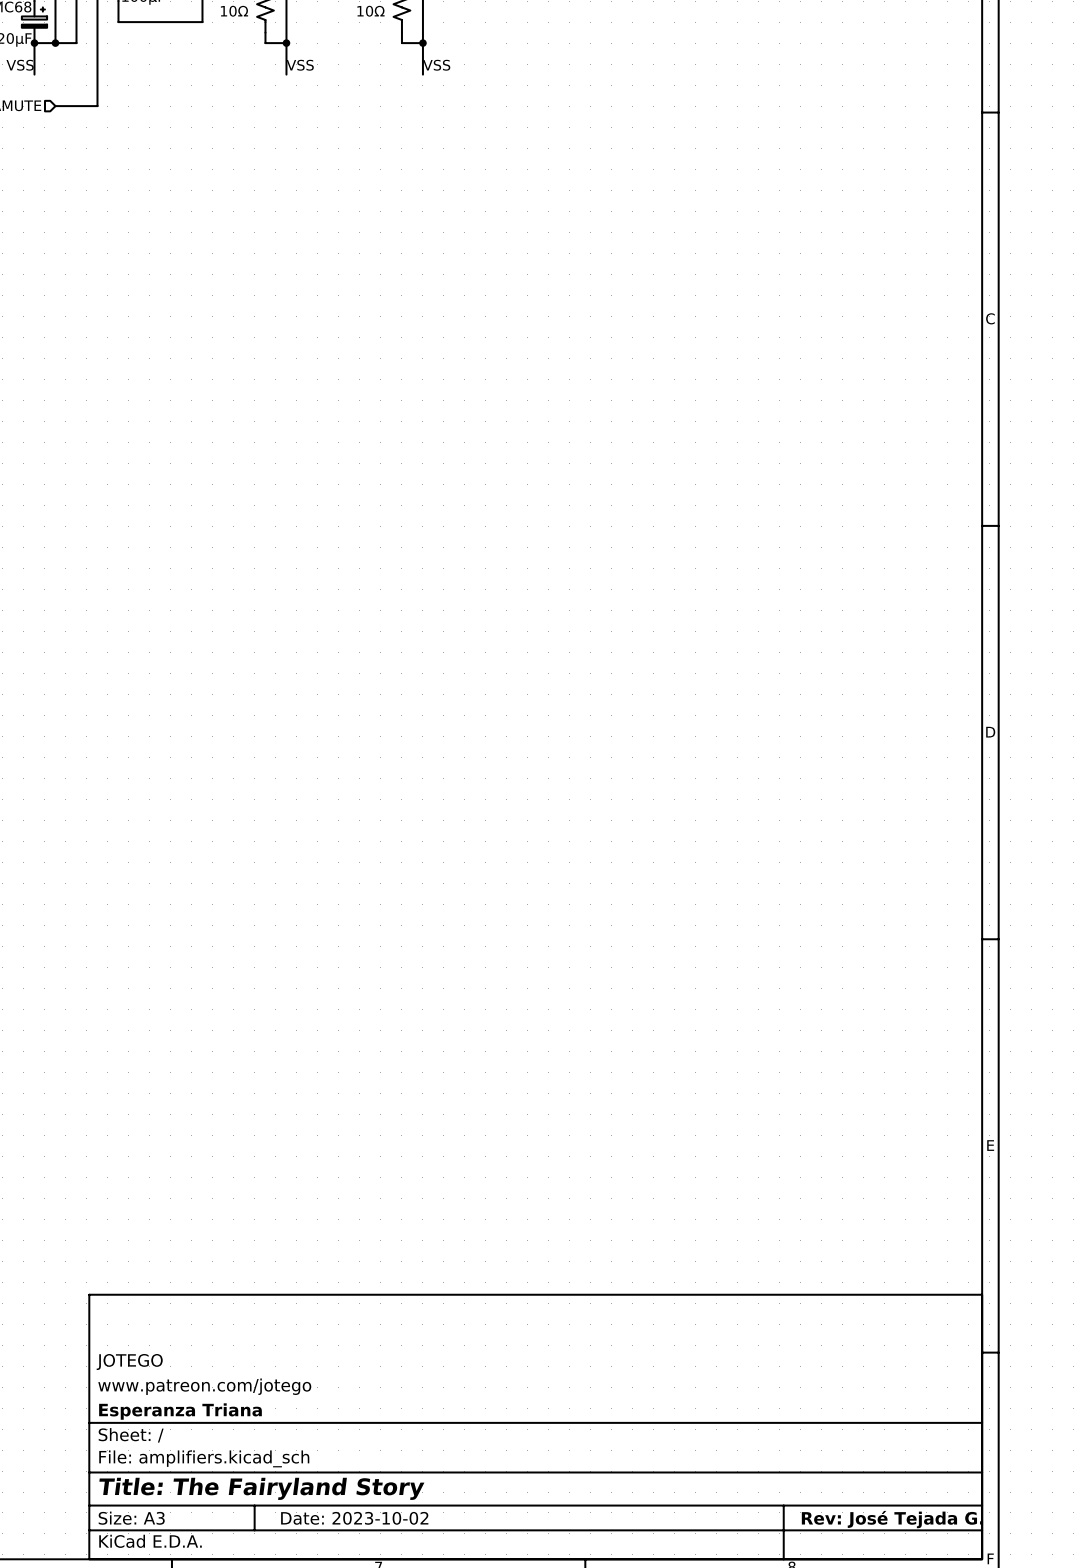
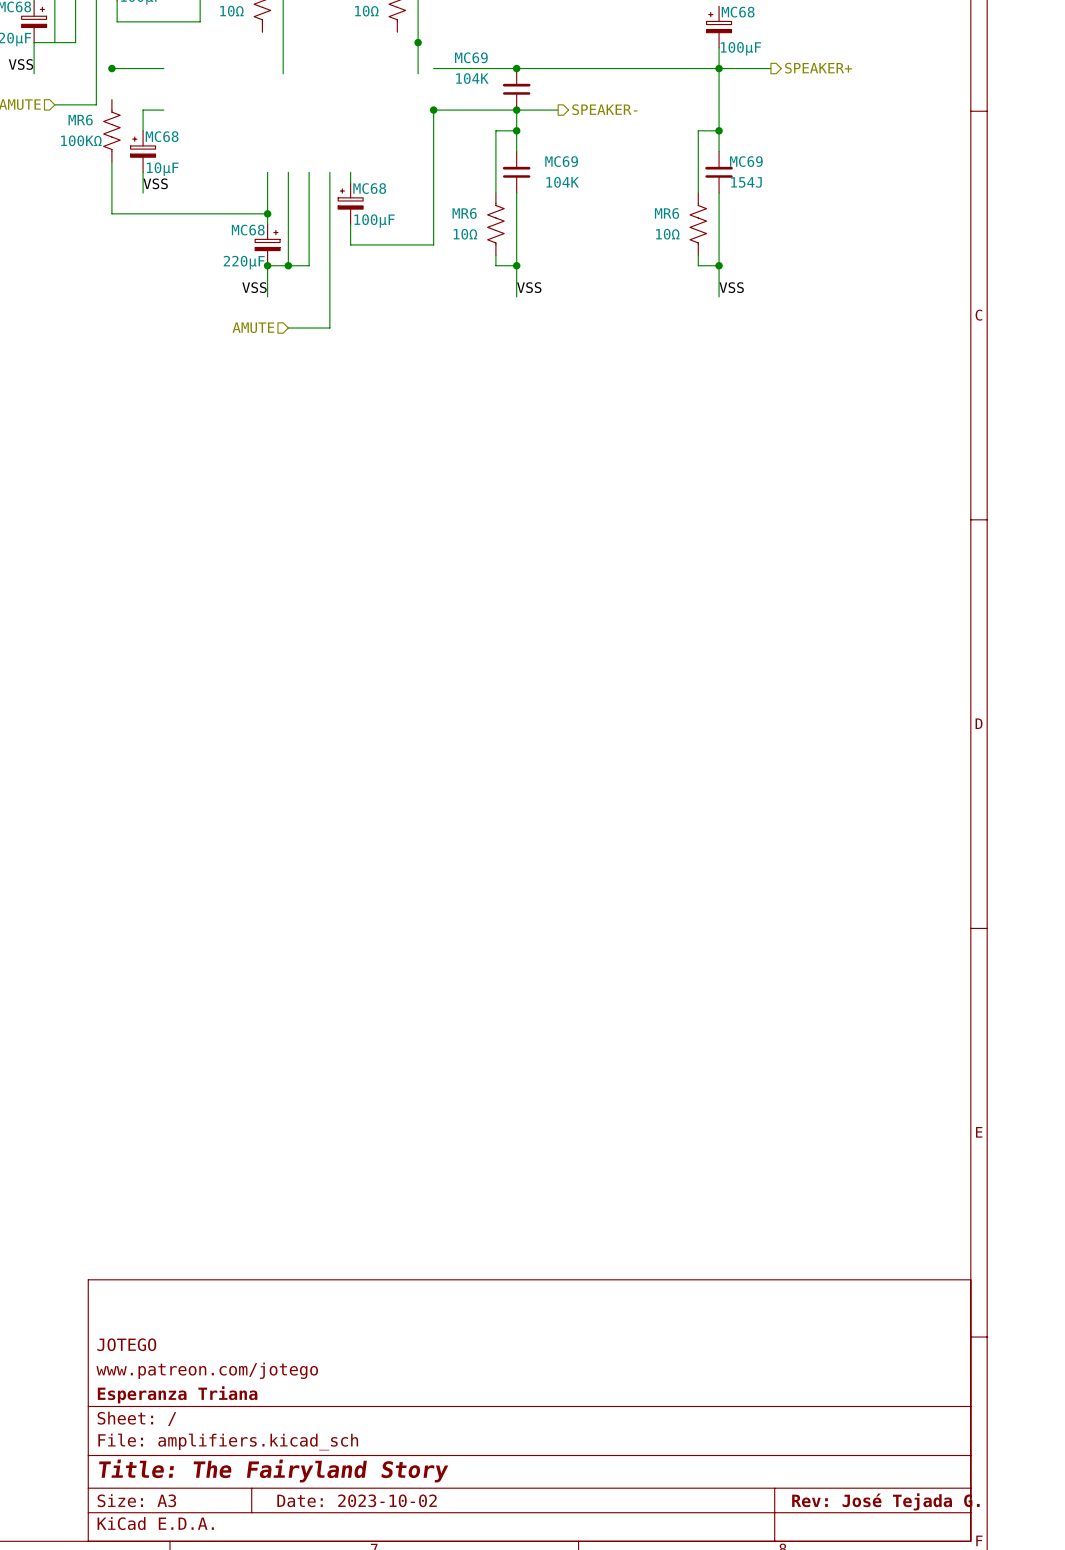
MC68: none -> 100µF (719, 27)
wire: (265, 32) (265, 43) (286, 43) -> none
wire: (401, 32) (401, 43) (422, 43) -> none
junction: (34, 43) -> none
junction: (55, 43) -> none
junction: (286, 43) -> none
wire: none -> (719, 47) (719, 151)
label: VSS (300, 65) -> none
label: VSS (436, 65) -> none
hierarchical label: none -> SPEAKER+ (818, 68)
wire: none -> (111, 68) (163, 68)
junction: none -> (111, 68)
wire: none -> (433, 68) (770, 68)
junction: none -> (516, 68)
junction: none -> (719, 68)
MC69: none -> 104K (516, 89)
hierarchical label: none -> SPEAKER- (604, 109)
wire: none -> (163, 110) (143, 110) (143, 130)
junction: none -> (433, 110)
wire: none -> (516, 110) (516, 151)
junction: none -> (516, 110)
wire: none -> (558, 110) (433, 110) (433, 244) (350, 244) (350, 224)
MR6: none -> 100KΩ (111, 130)
wire: none -> (516, 130) (495, 130) (495, 193)
junction: none -> (516, 130)
wire: none -> (719, 130) (698, 130) (698, 193)
junction: none -> (719, 130)
MC68: none -> 10µF (143, 151)
wire: none -> (111, 161) (111, 213) (267, 213)
wire: none -> (143, 172) (143, 193)
wire: none -> (267, 172) (267, 224)
wire: none -> (288, 172) (288, 265)
wire: none -> (309, 172) (309, 265) (267, 265) (267, 296)
wire: none -> (329, 172) (329, 328) (288, 328)
wire: none -> (350, 172) (350, 182)
MC69: none -> 104K (516, 172)
MC69: none -> 154J (719, 172)
label: none -> VSS (155, 183)
wire: none -> (516, 193) (516, 296)
wire: none -> (719, 193) (719, 296)
MC68: none -> 100µF (350, 203)
junction: none -> (267, 213)
MR6: none -> 10Ω (495, 224)
MR6: none -> 10Ω (698, 224)
MC68: none -> 220µF (267, 244)
wire: none -> (495, 255) (495, 265) (516, 265)
wire: none -> (698, 255) (698, 265) (719, 265)
junction: none -> (267, 265)
junction: none -> (288, 265)
junction: none -> (516, 265)
junction: none -> (719, 265)
label: none -> VSS (254, 287)
label: none -> VSS (529, 287)
label: none -> VSS (731, 287)
hierarchical label: none -> AMUTE (253, 327)

